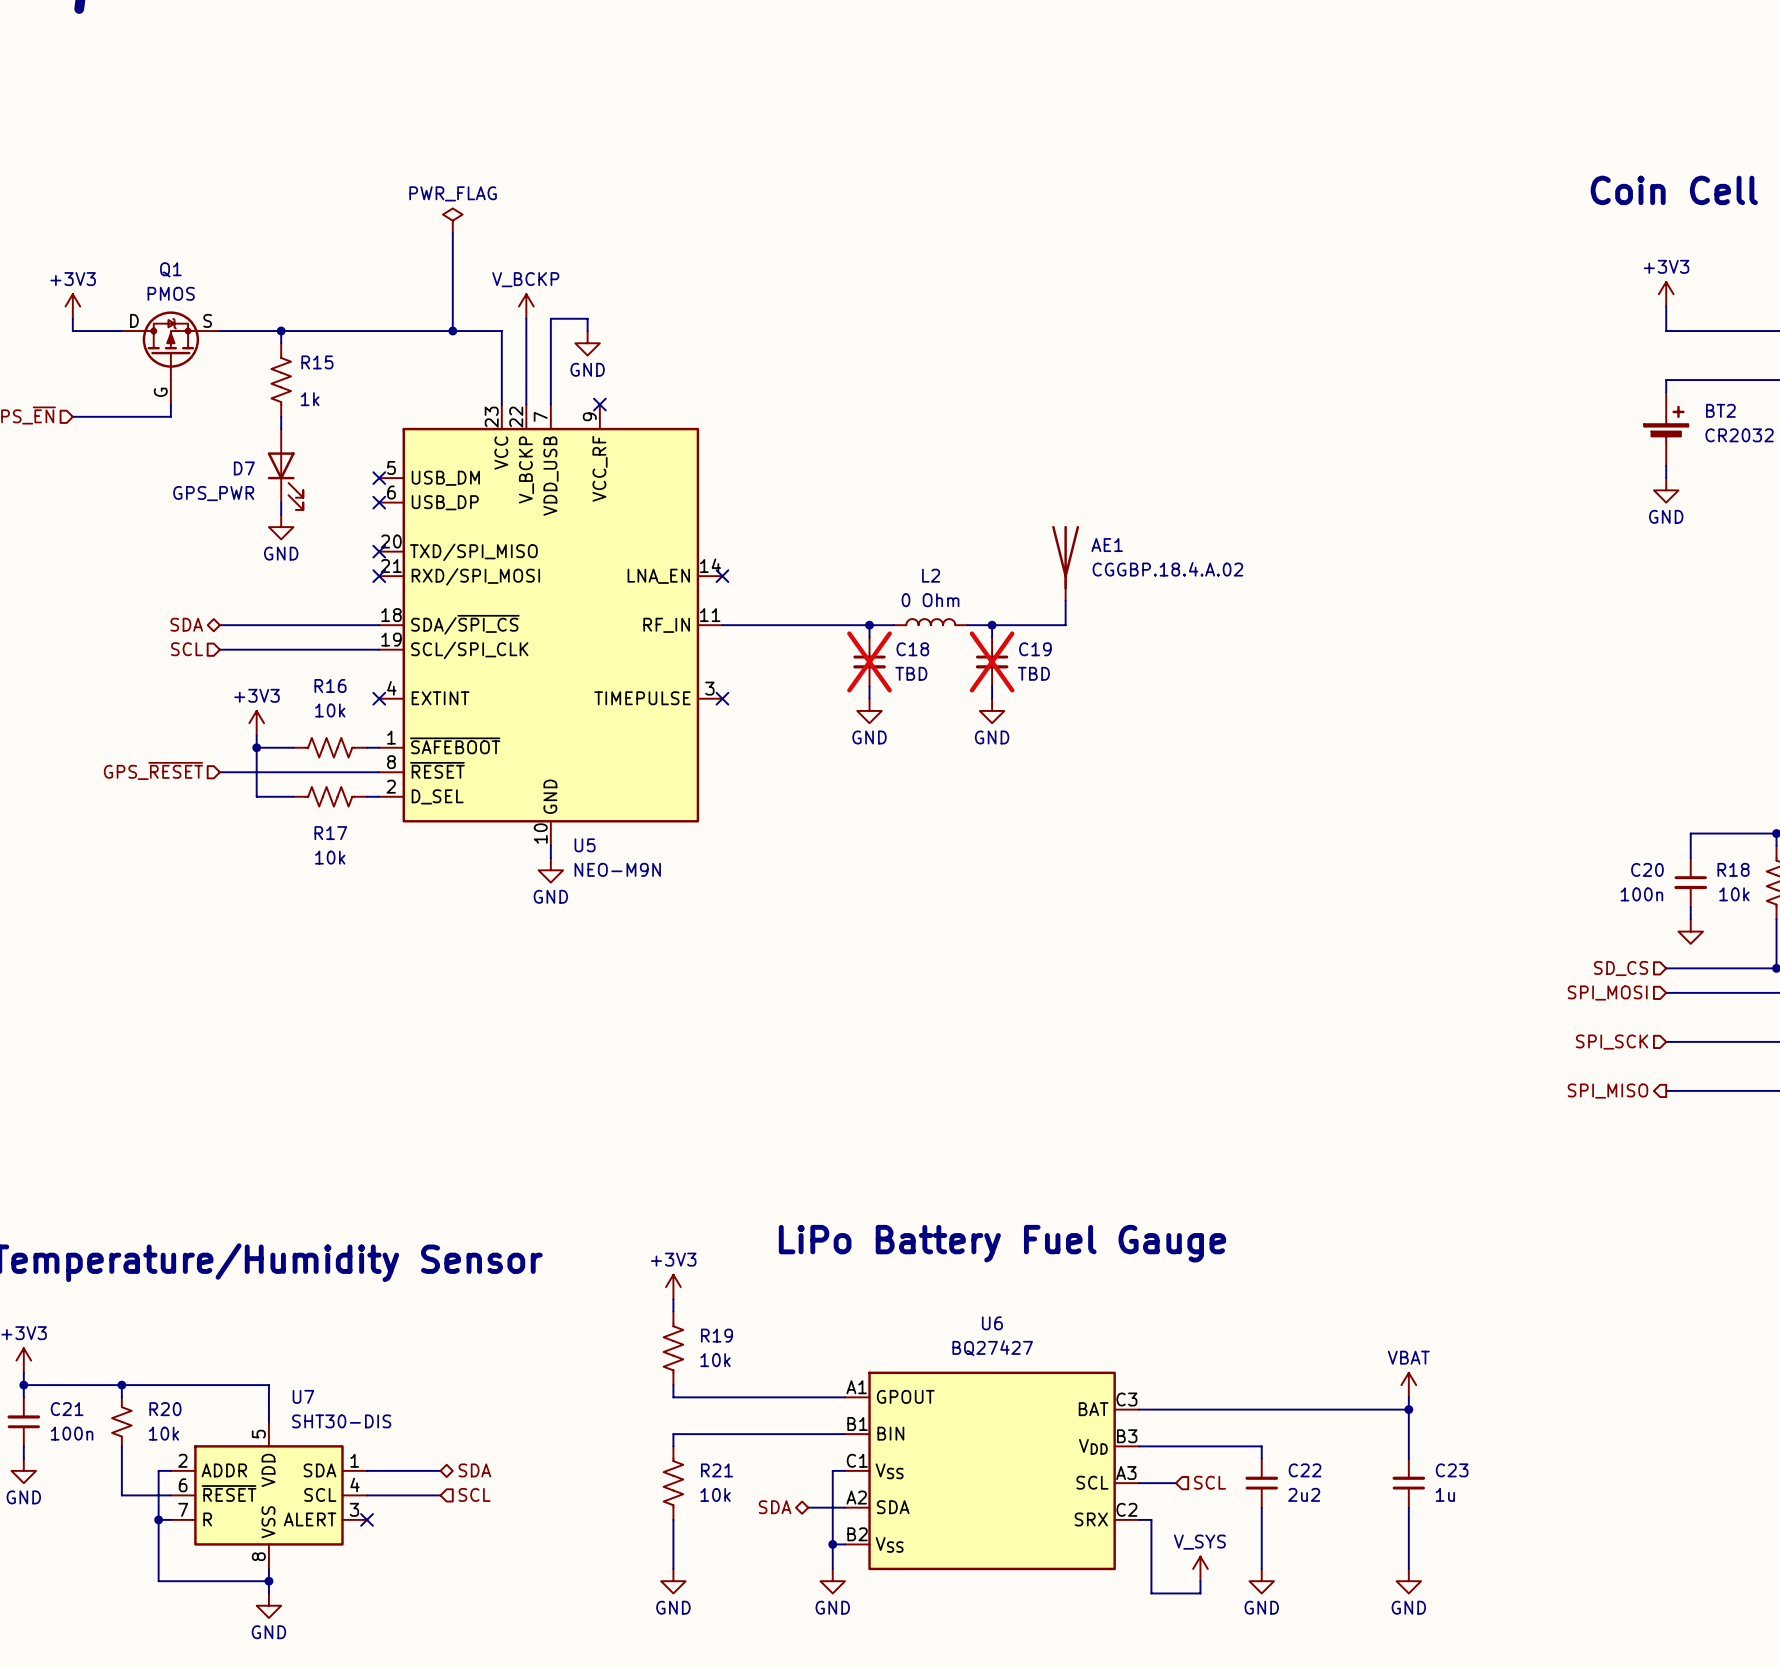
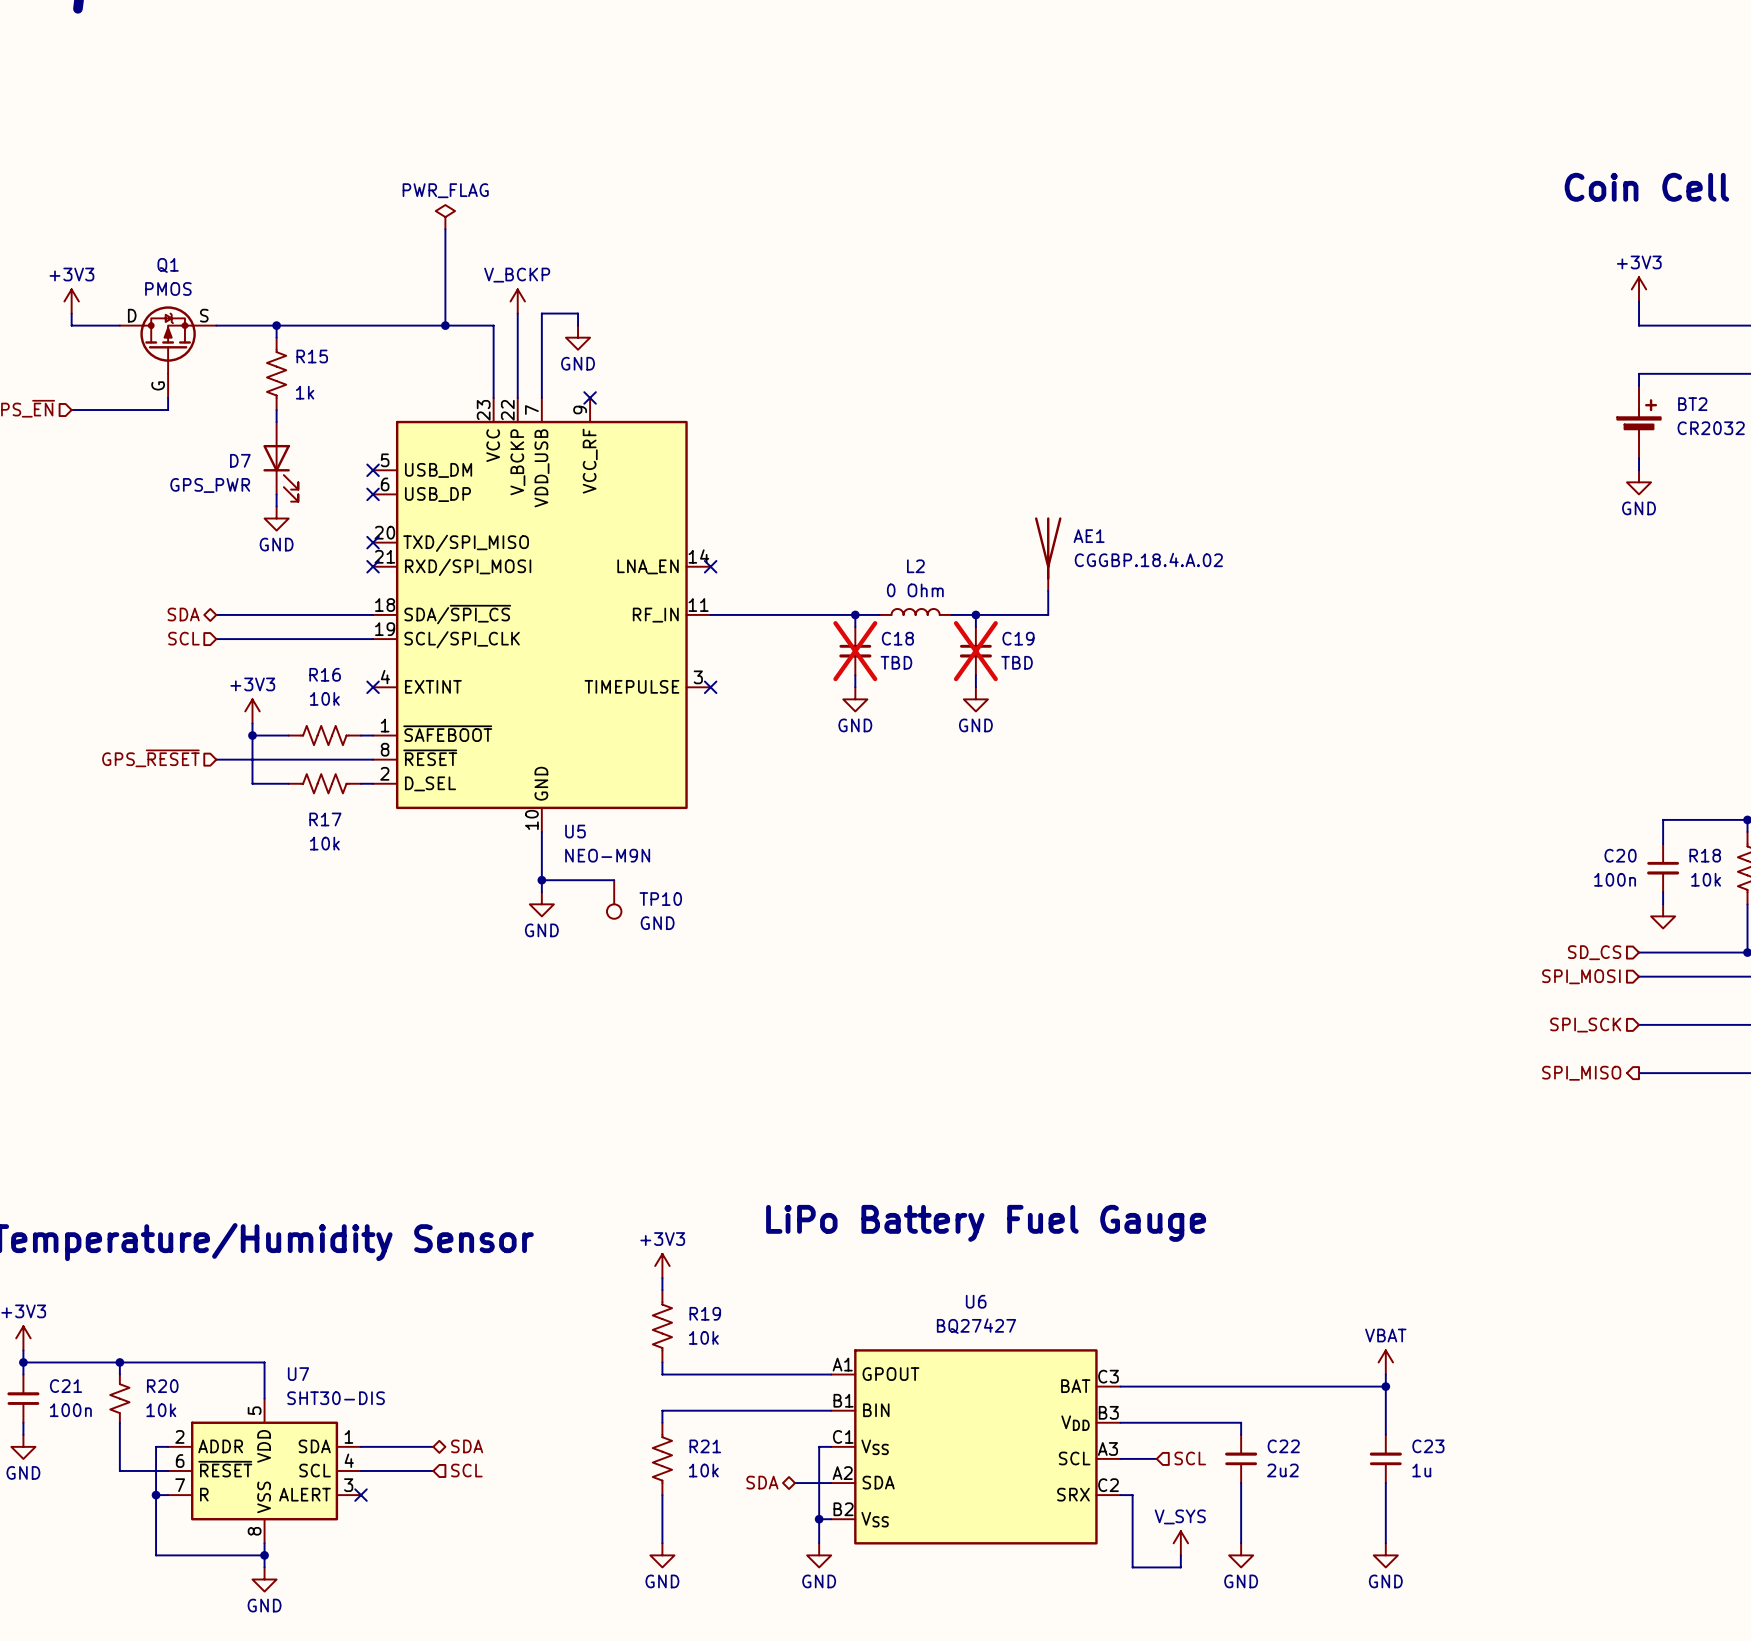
wire: none -> (541, 844) (541, 892)
power symbol position: GND (550, 870) -> GND (541, 904)
wire: none -> (541, 880) (614, 880)
junction: none -> (541, 880)
TP10: none -> GND (614, 899)

